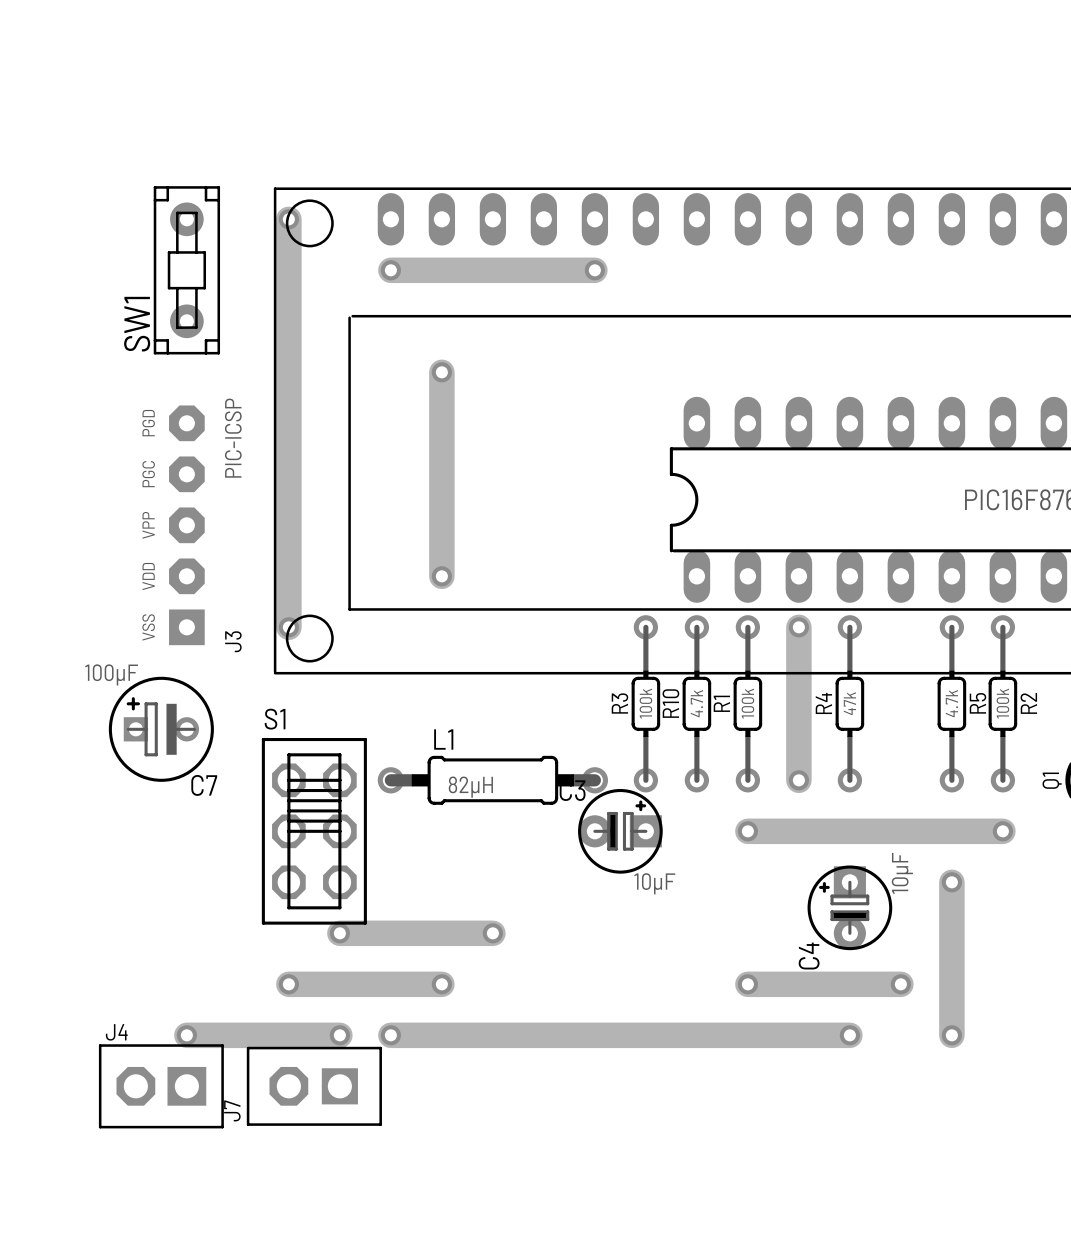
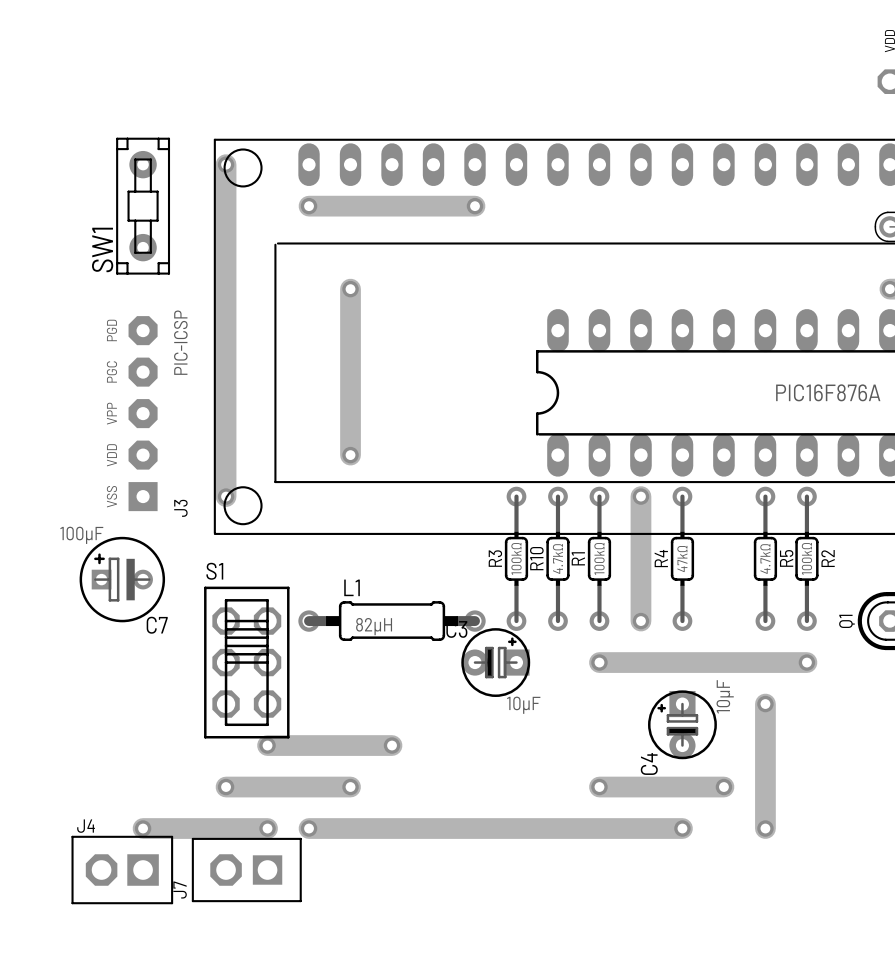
R3 value: 100k (645, 703) -> 100kΩ (516, 558)
R10 value: 4.7k (696, 703) -> 4.7kΩ (557, 558)
R1 value: 100k (747, 703) -> 100kΩ (599, 558)
R4 value: 47k (849, 703) -> 47kΩ (682, 558)
R5 value: 4.7k (951, 703) -> 4.7kΩ (765, 558)
R2 value: 100k (1002, 703) -> 100kΩ (806, 558)

